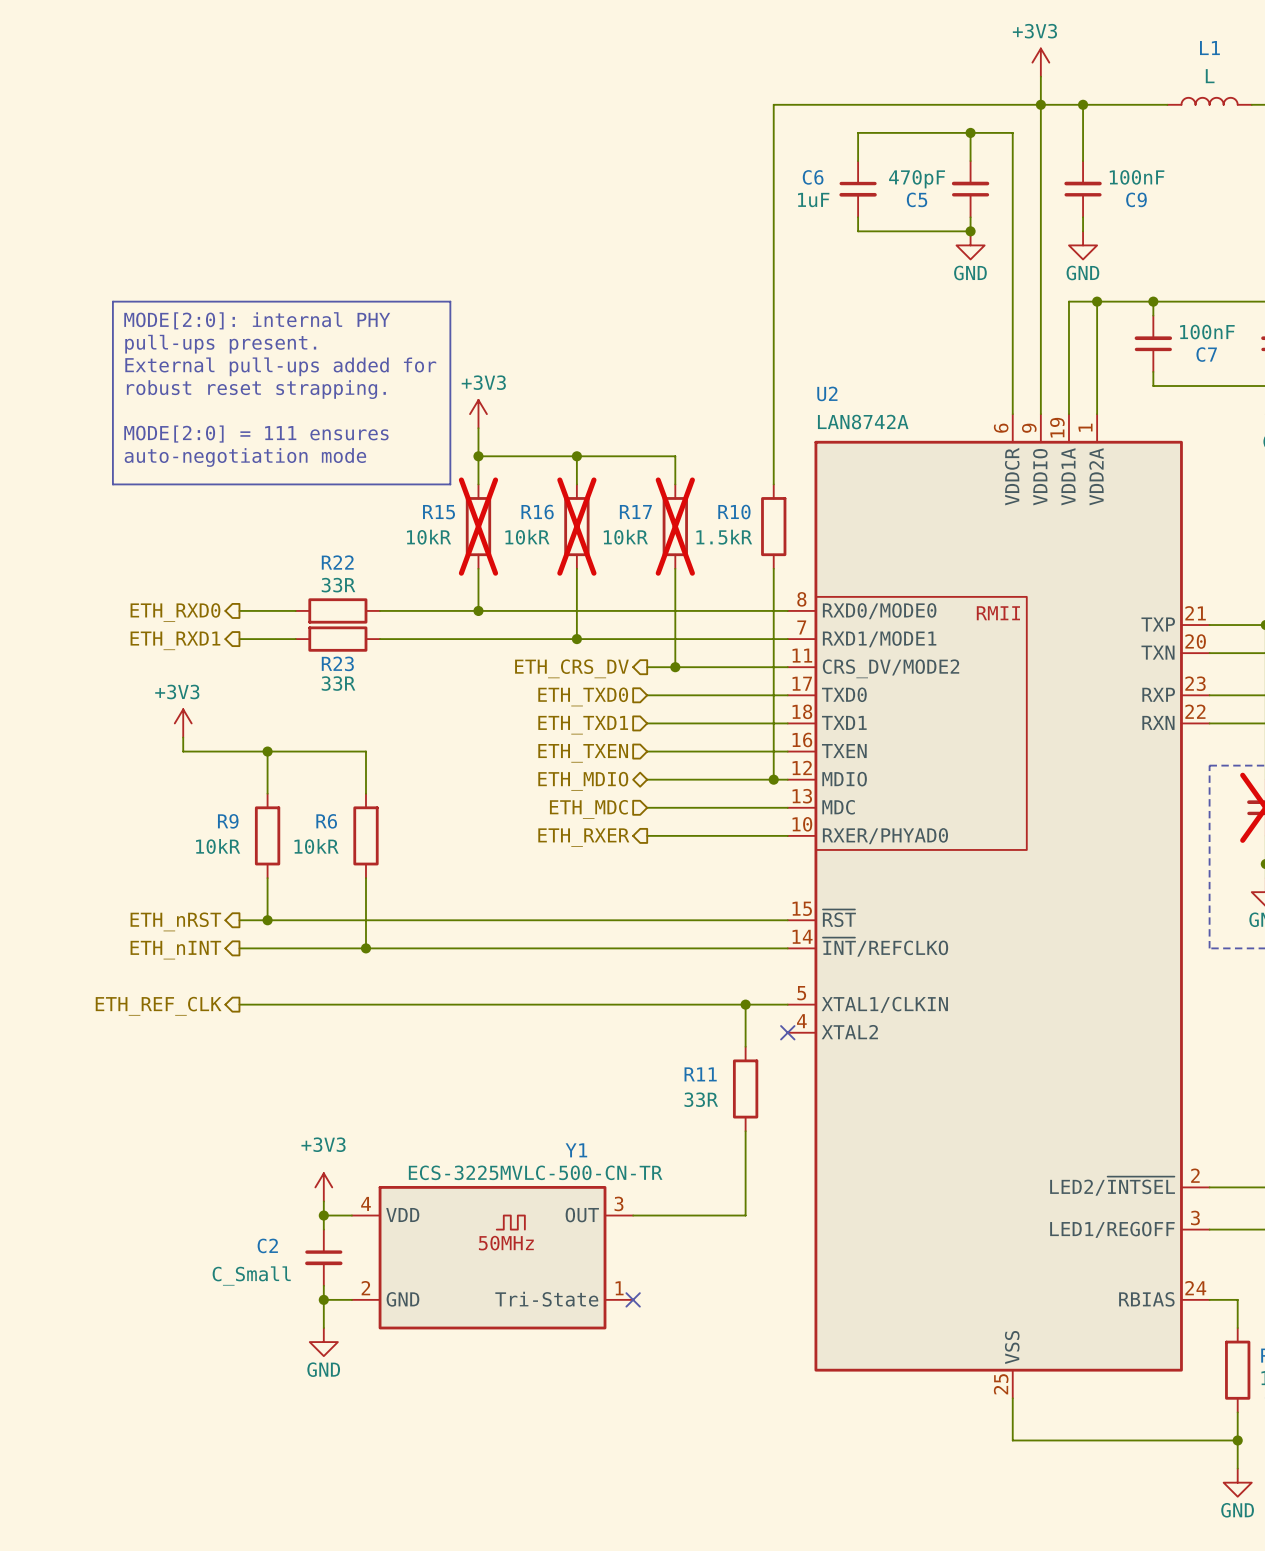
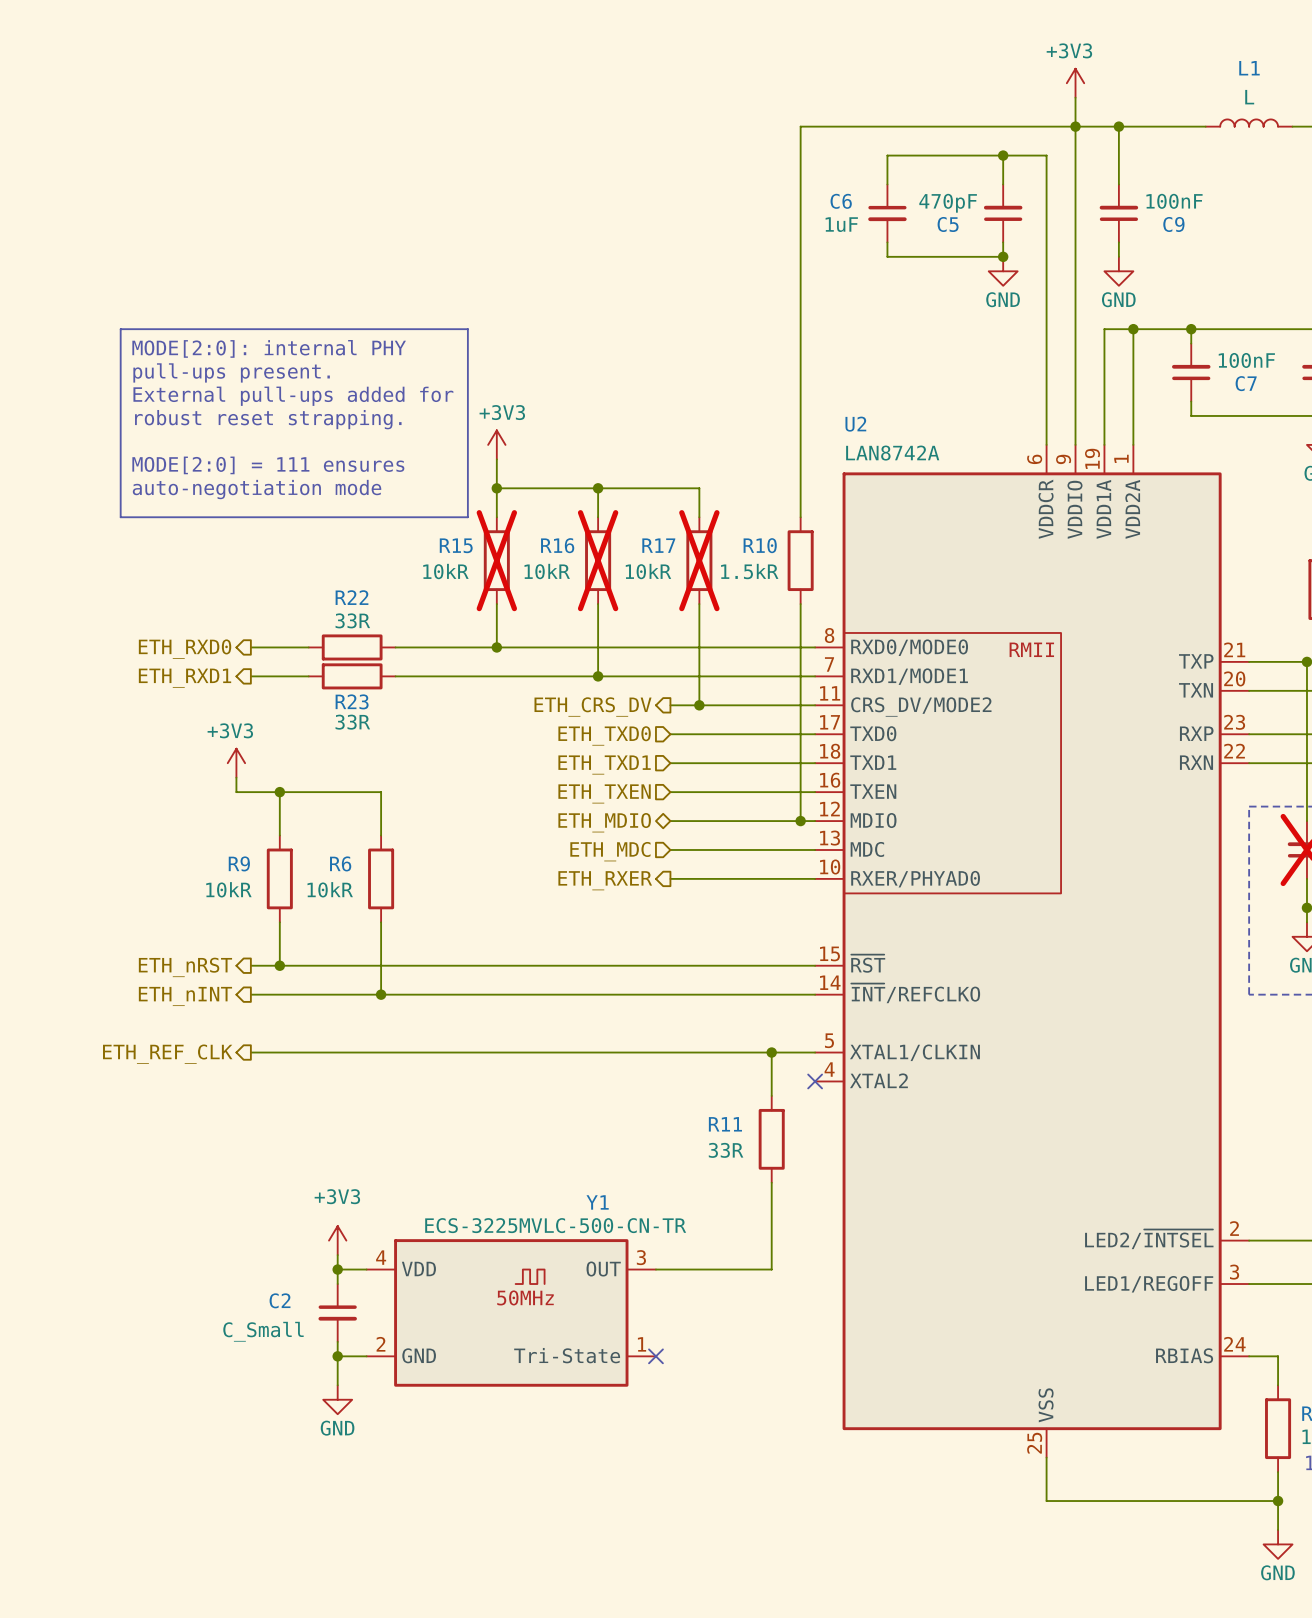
power symbol position: +3V3 (183, 723) -> +3V3 (236, 763)
wire: (183, 737) (183, 751) (225, 751) -> (236, 777) (236, 792)

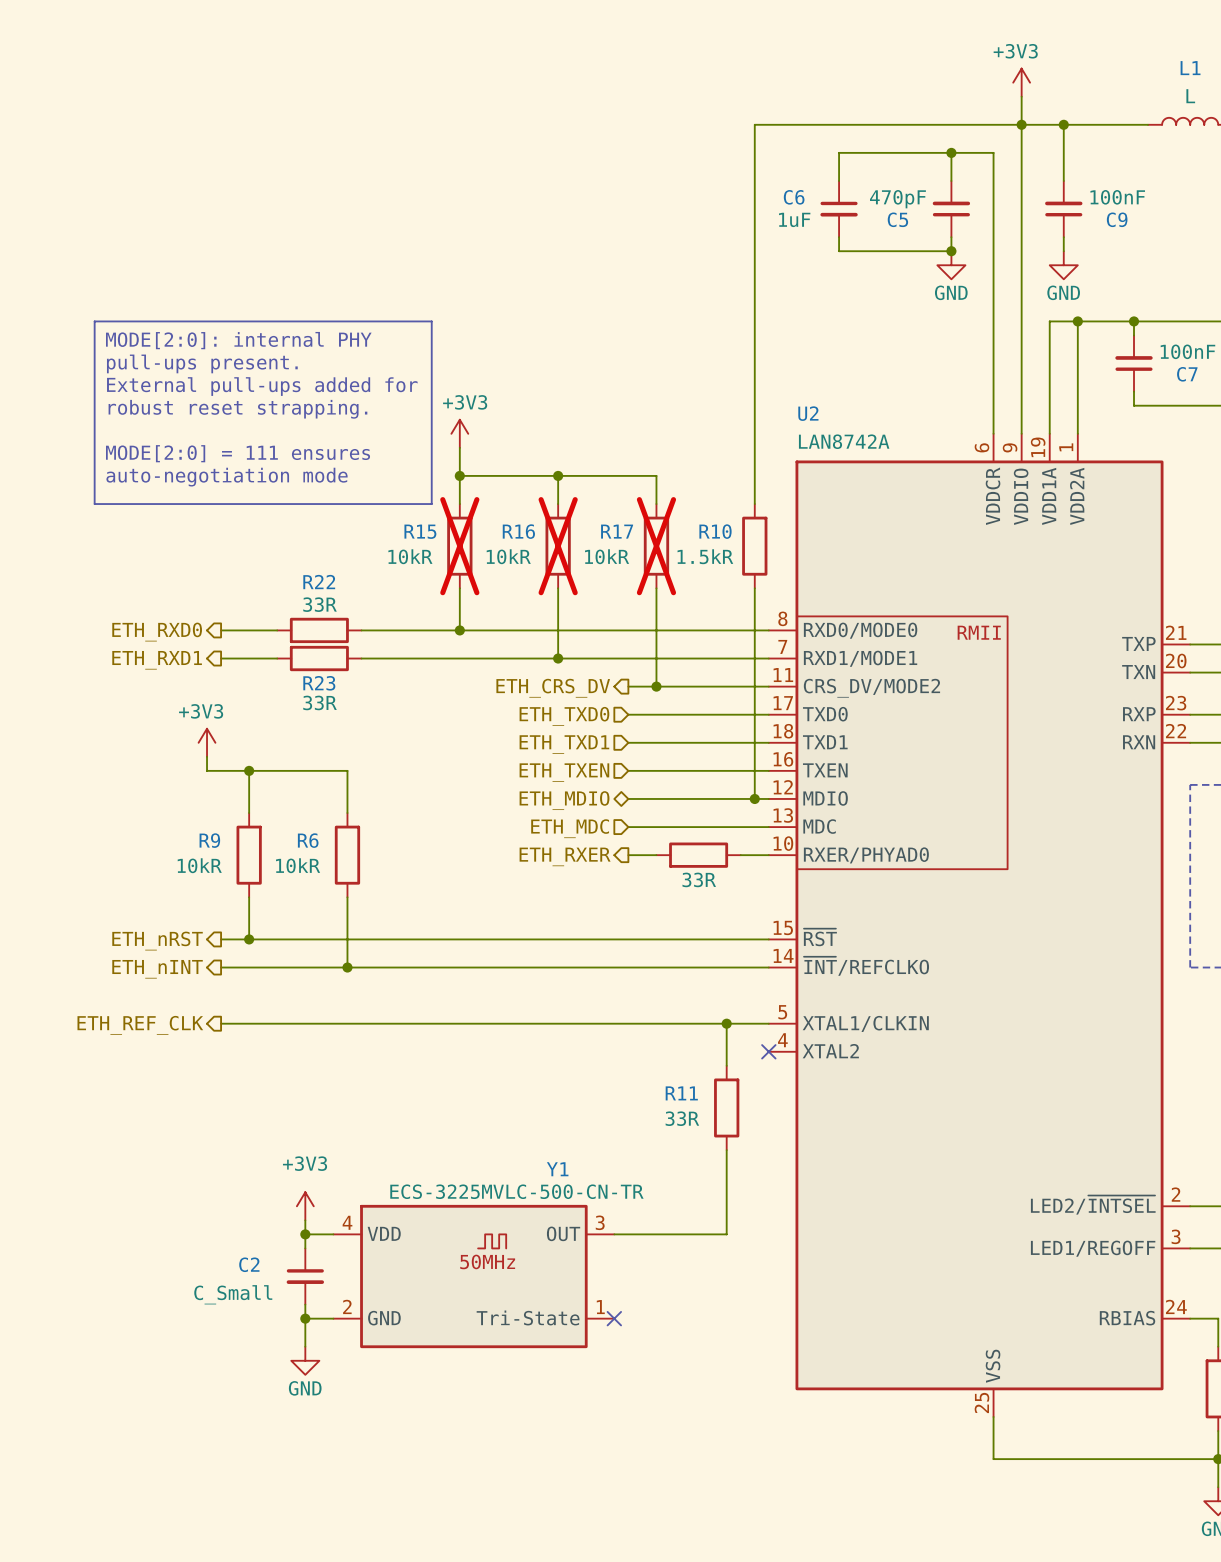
wire: (699, 878) (786, 878) -> none
part: none -> 33R (698, 855)

